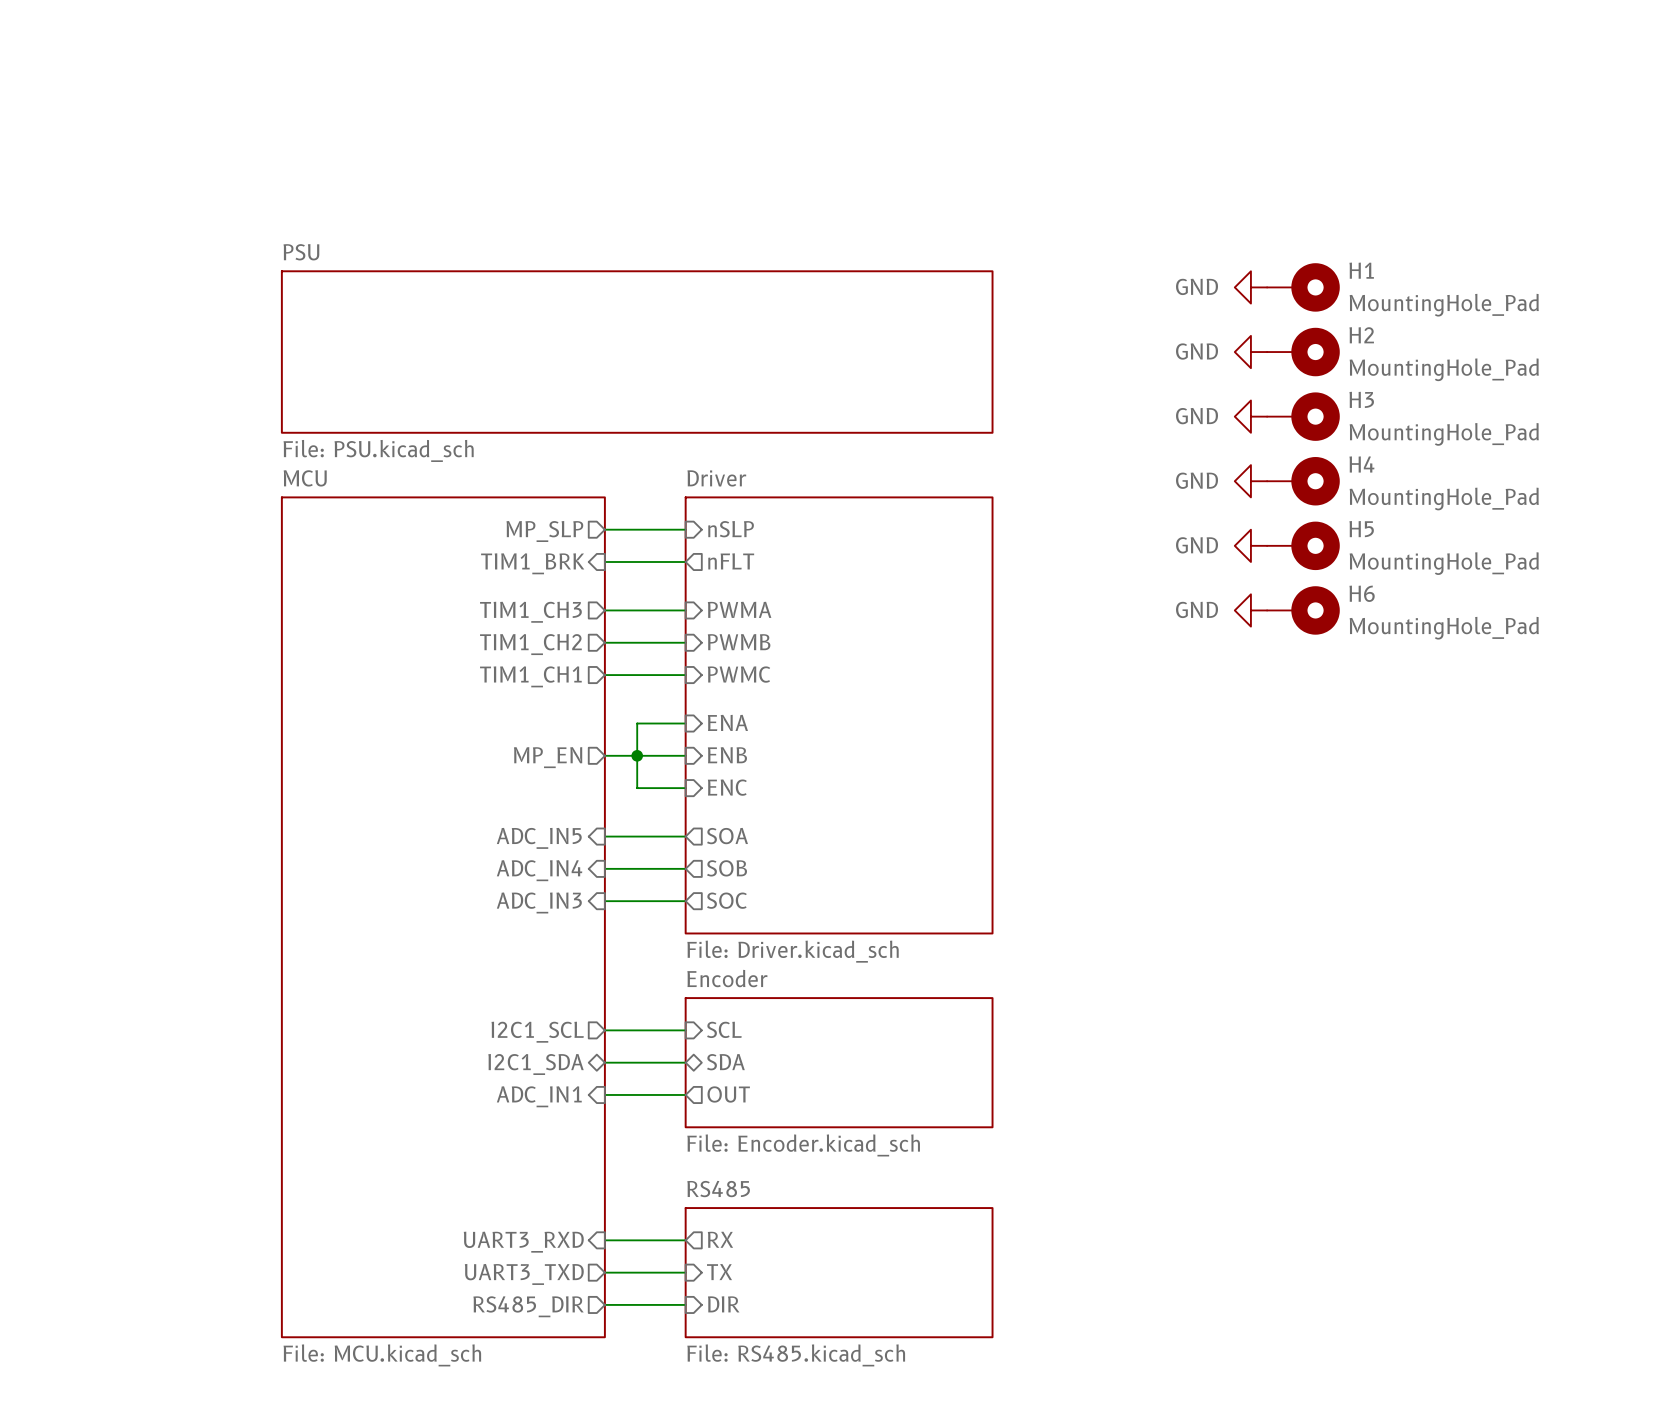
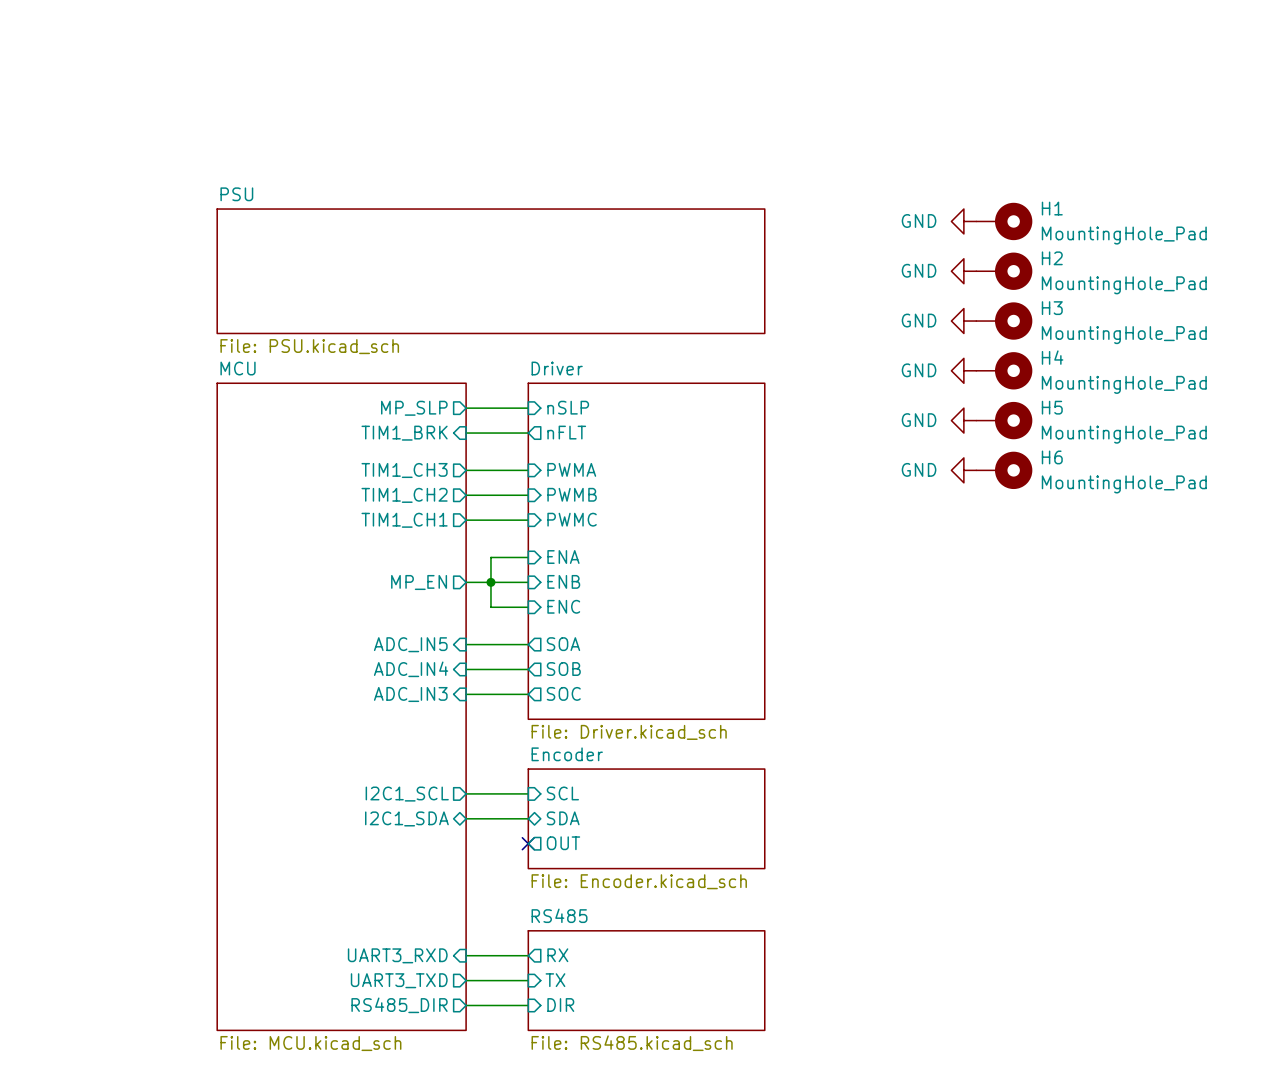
wire: (604, 1094) (685, 1094) -> none
no-connect mark: none -> (528, 843)
sheet pin: ADC_IN1 (539, 1096) -> none

